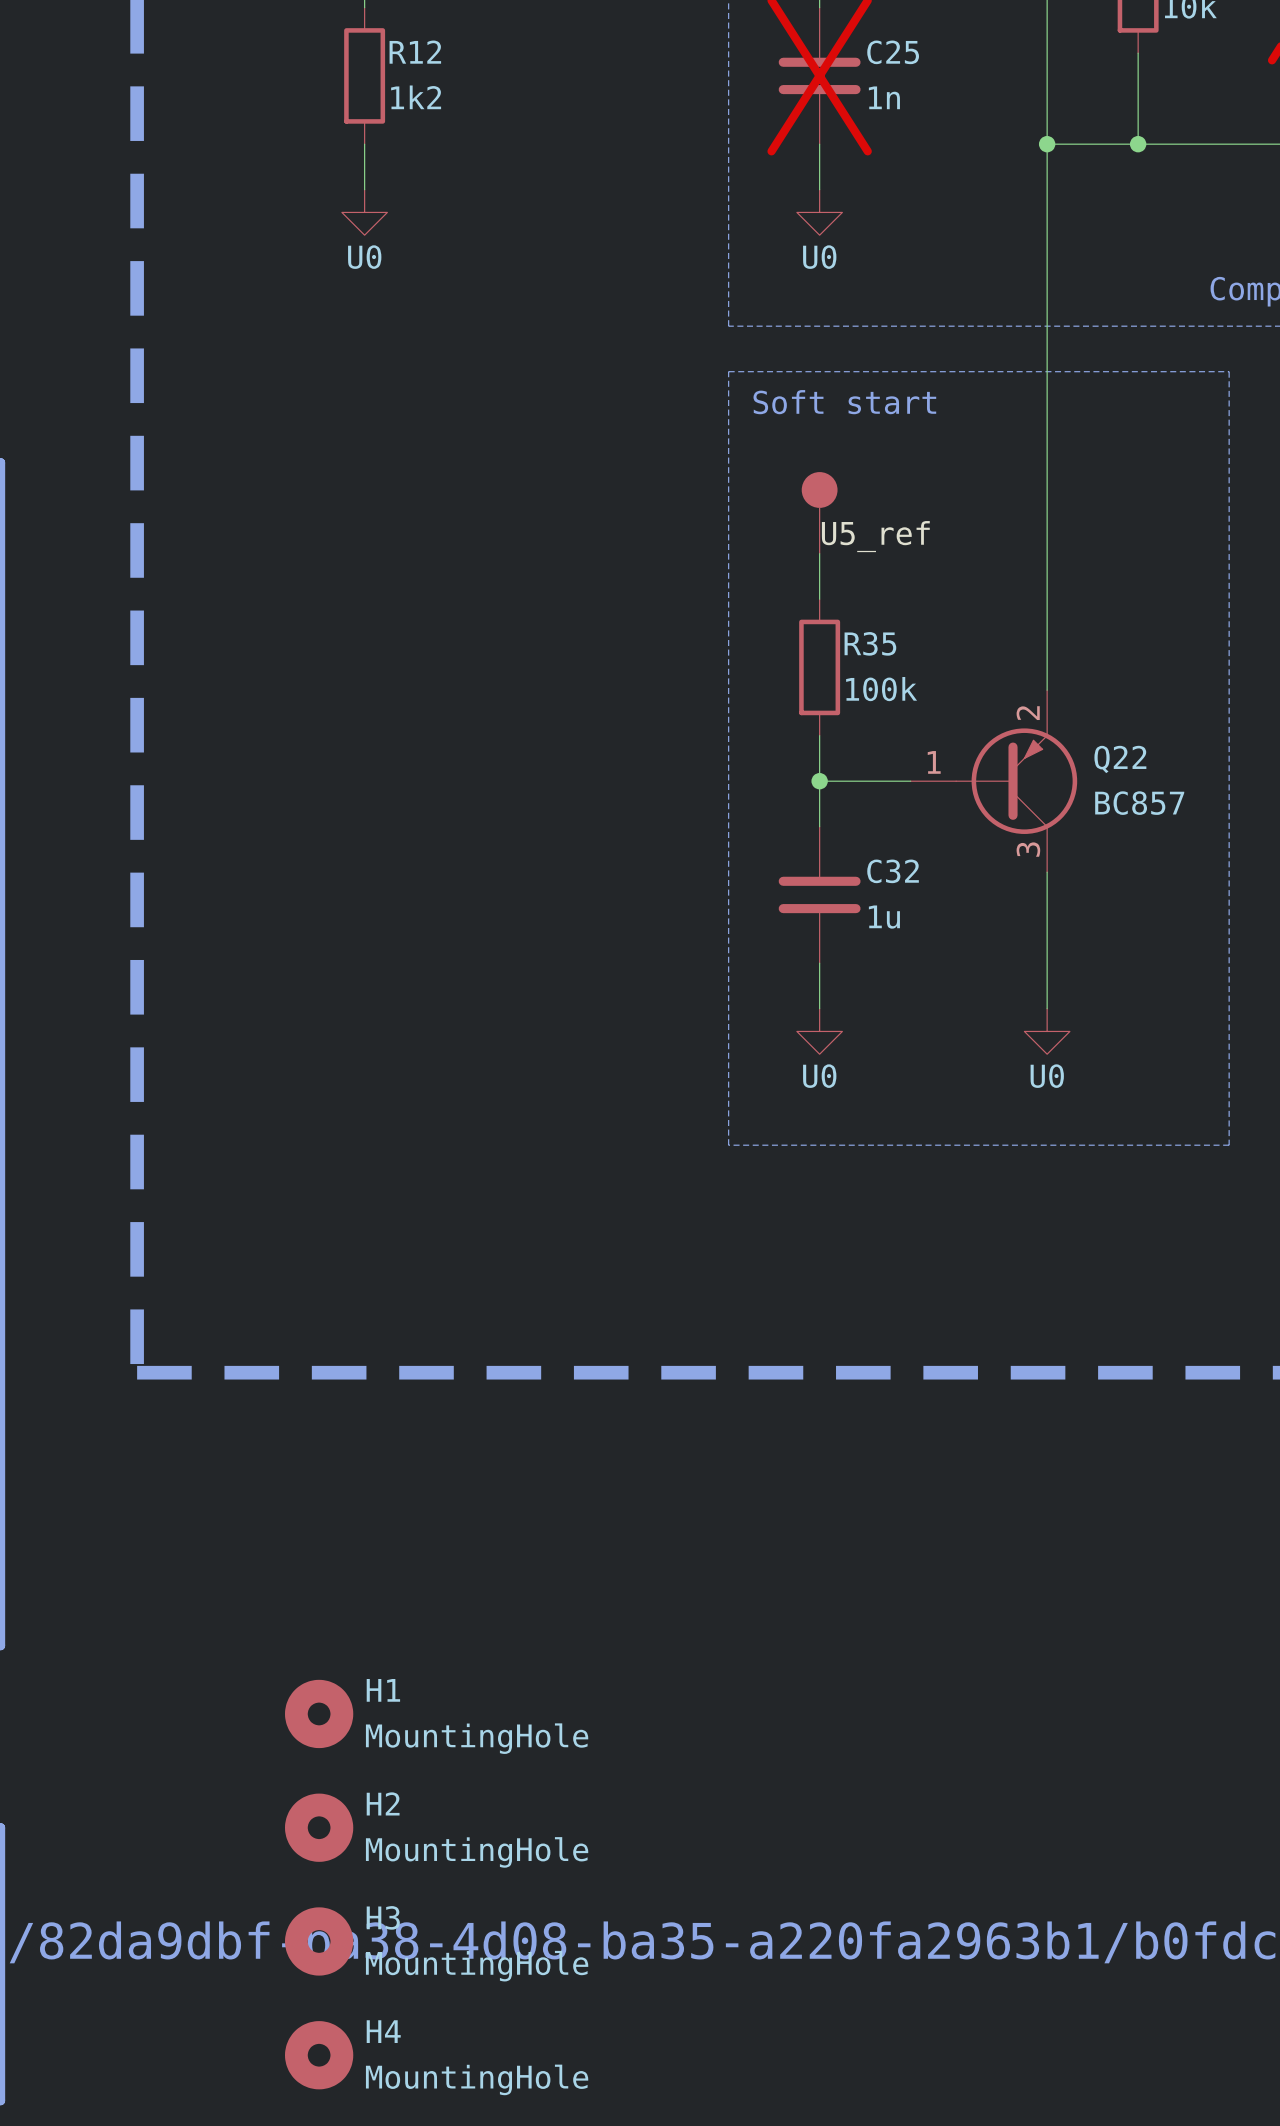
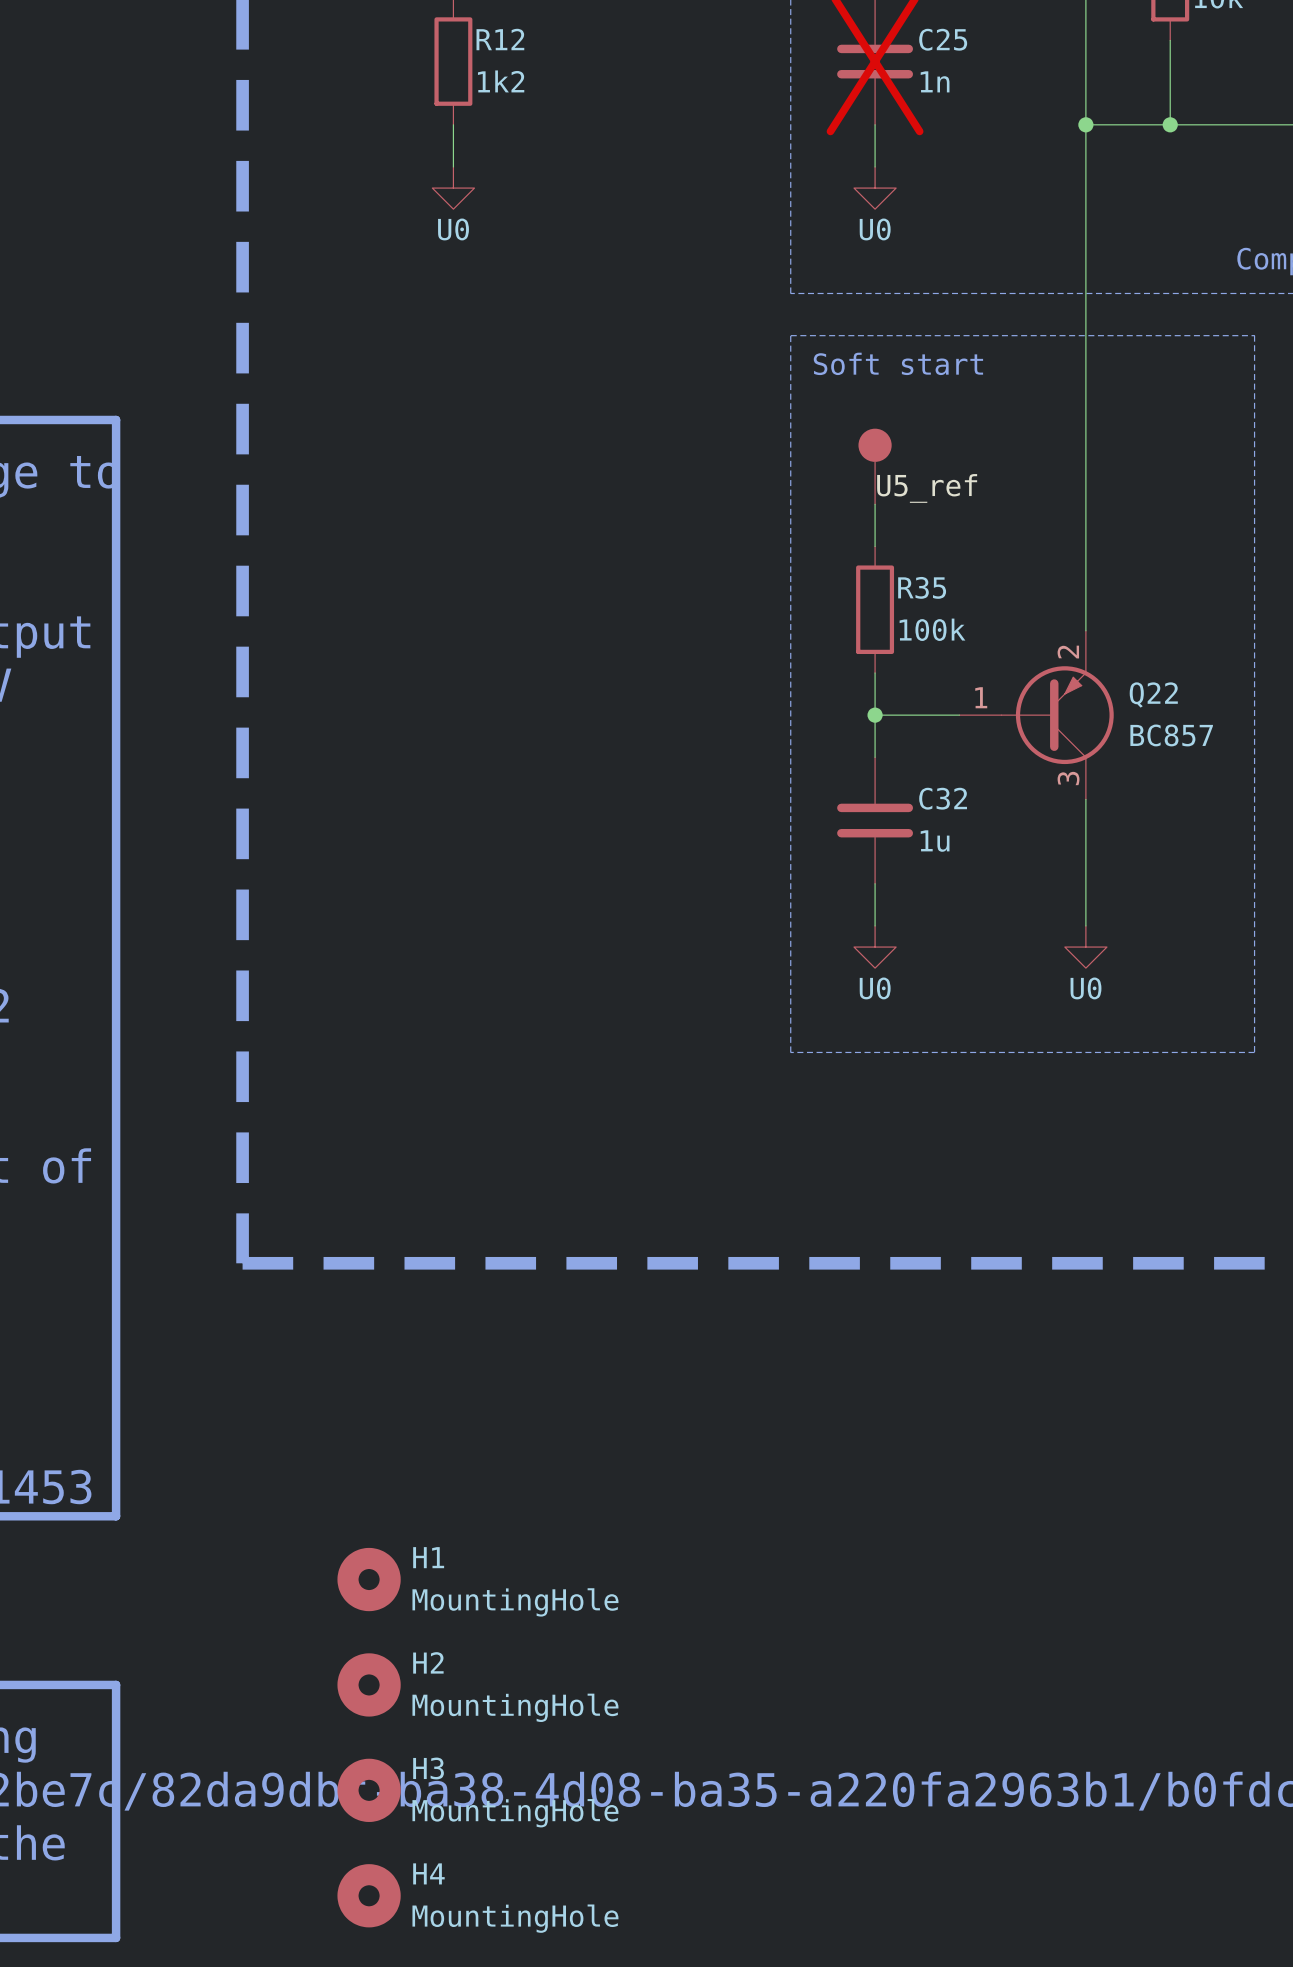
H1 position: (319, 1713) -> (369, 1579)
H2 position: (319, 1827) -> (369, 1684)
H3 position: (319, 1941) -> (369, 1790)
H4 position: (319, 2055) -> (369, 1895)

